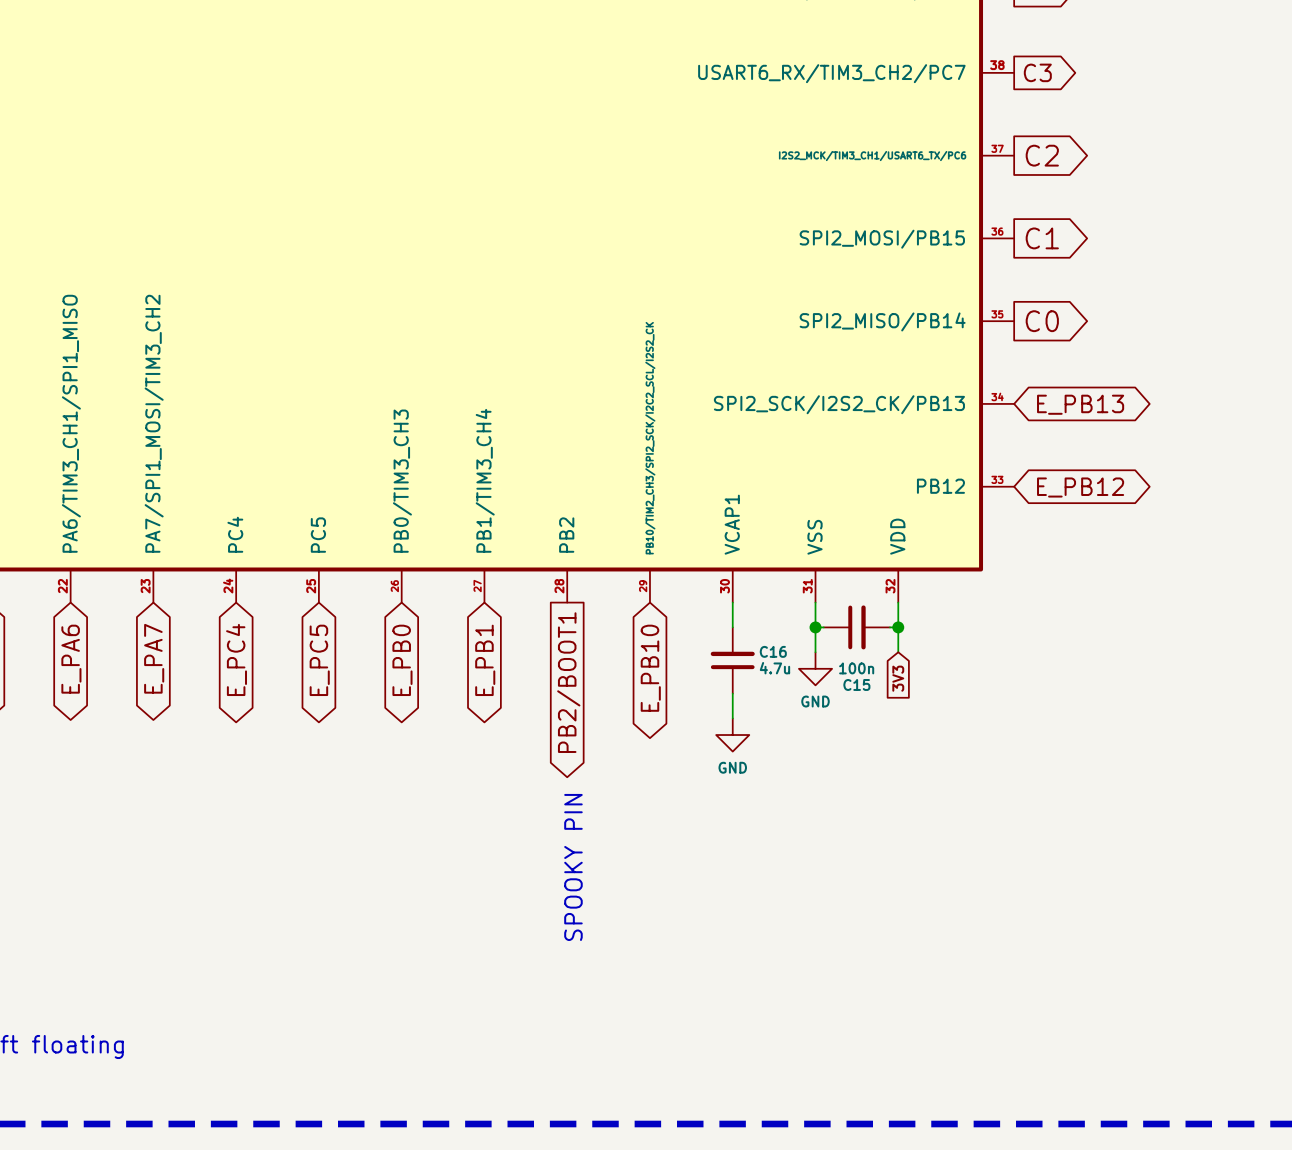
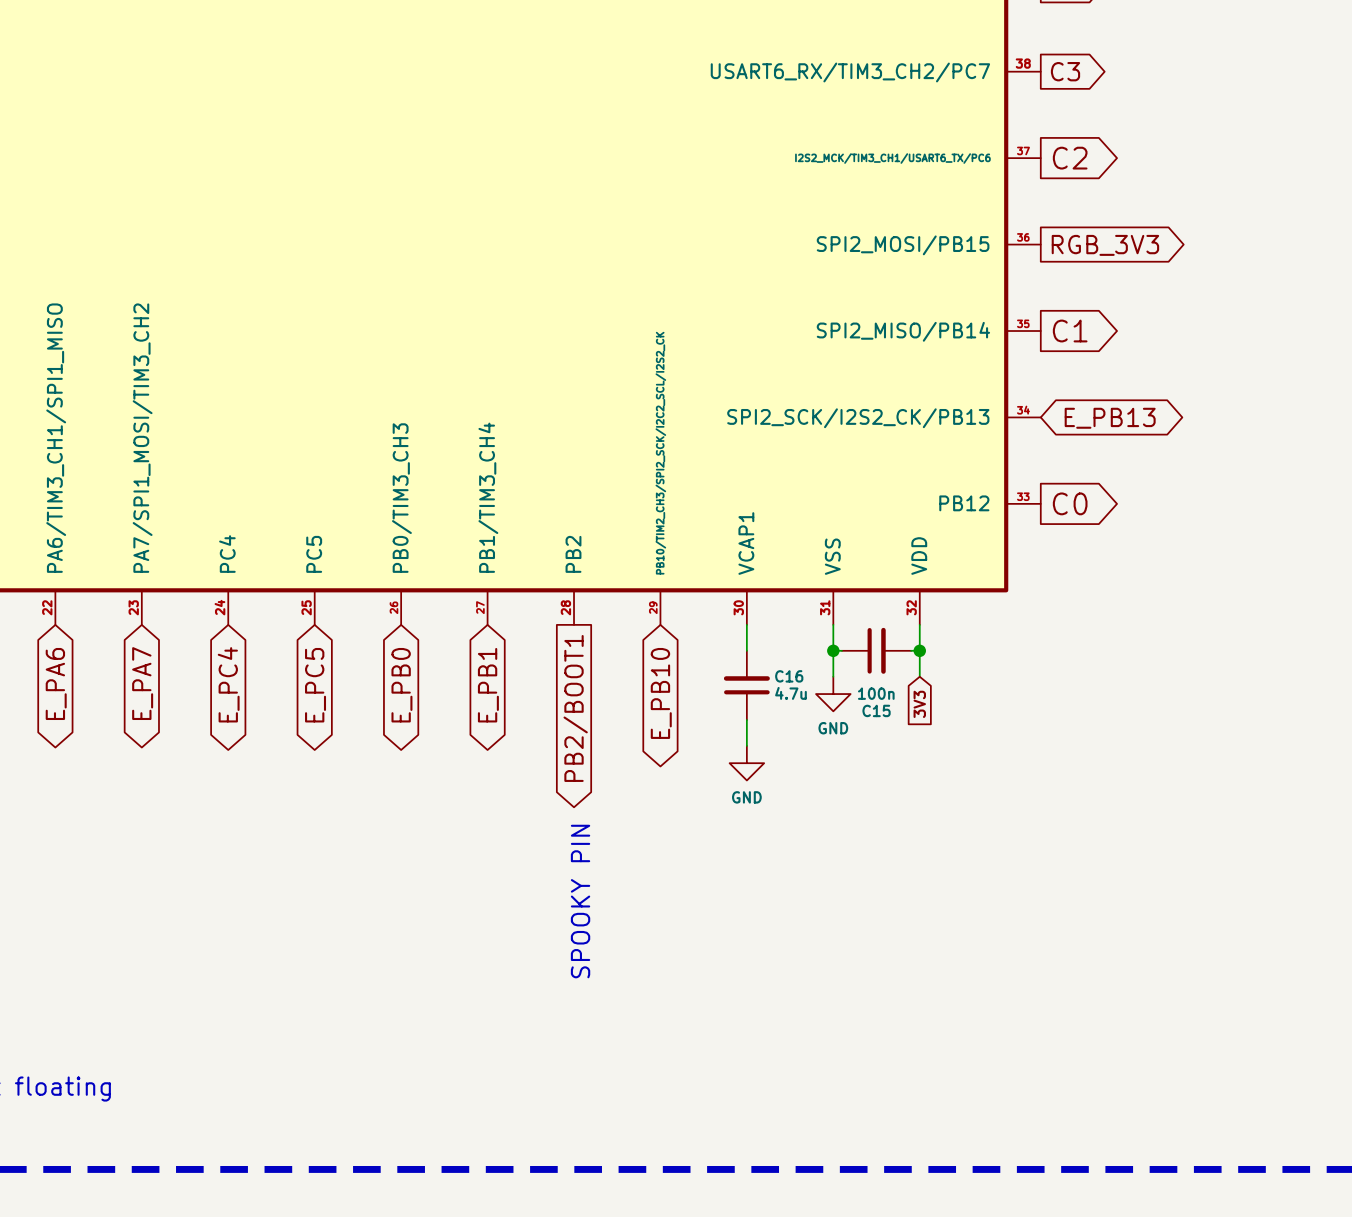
global label: C1 (1042, 238) -> RGB_3V3 (1105, 245)
global label: C0 (1042, 321) -> C1 (1070, 331)
global label shape: bidirectional (1080, 487) -> output (1070, 503)
global label: E_PB12 (1080, 487) -> C0 (1070, 503)

